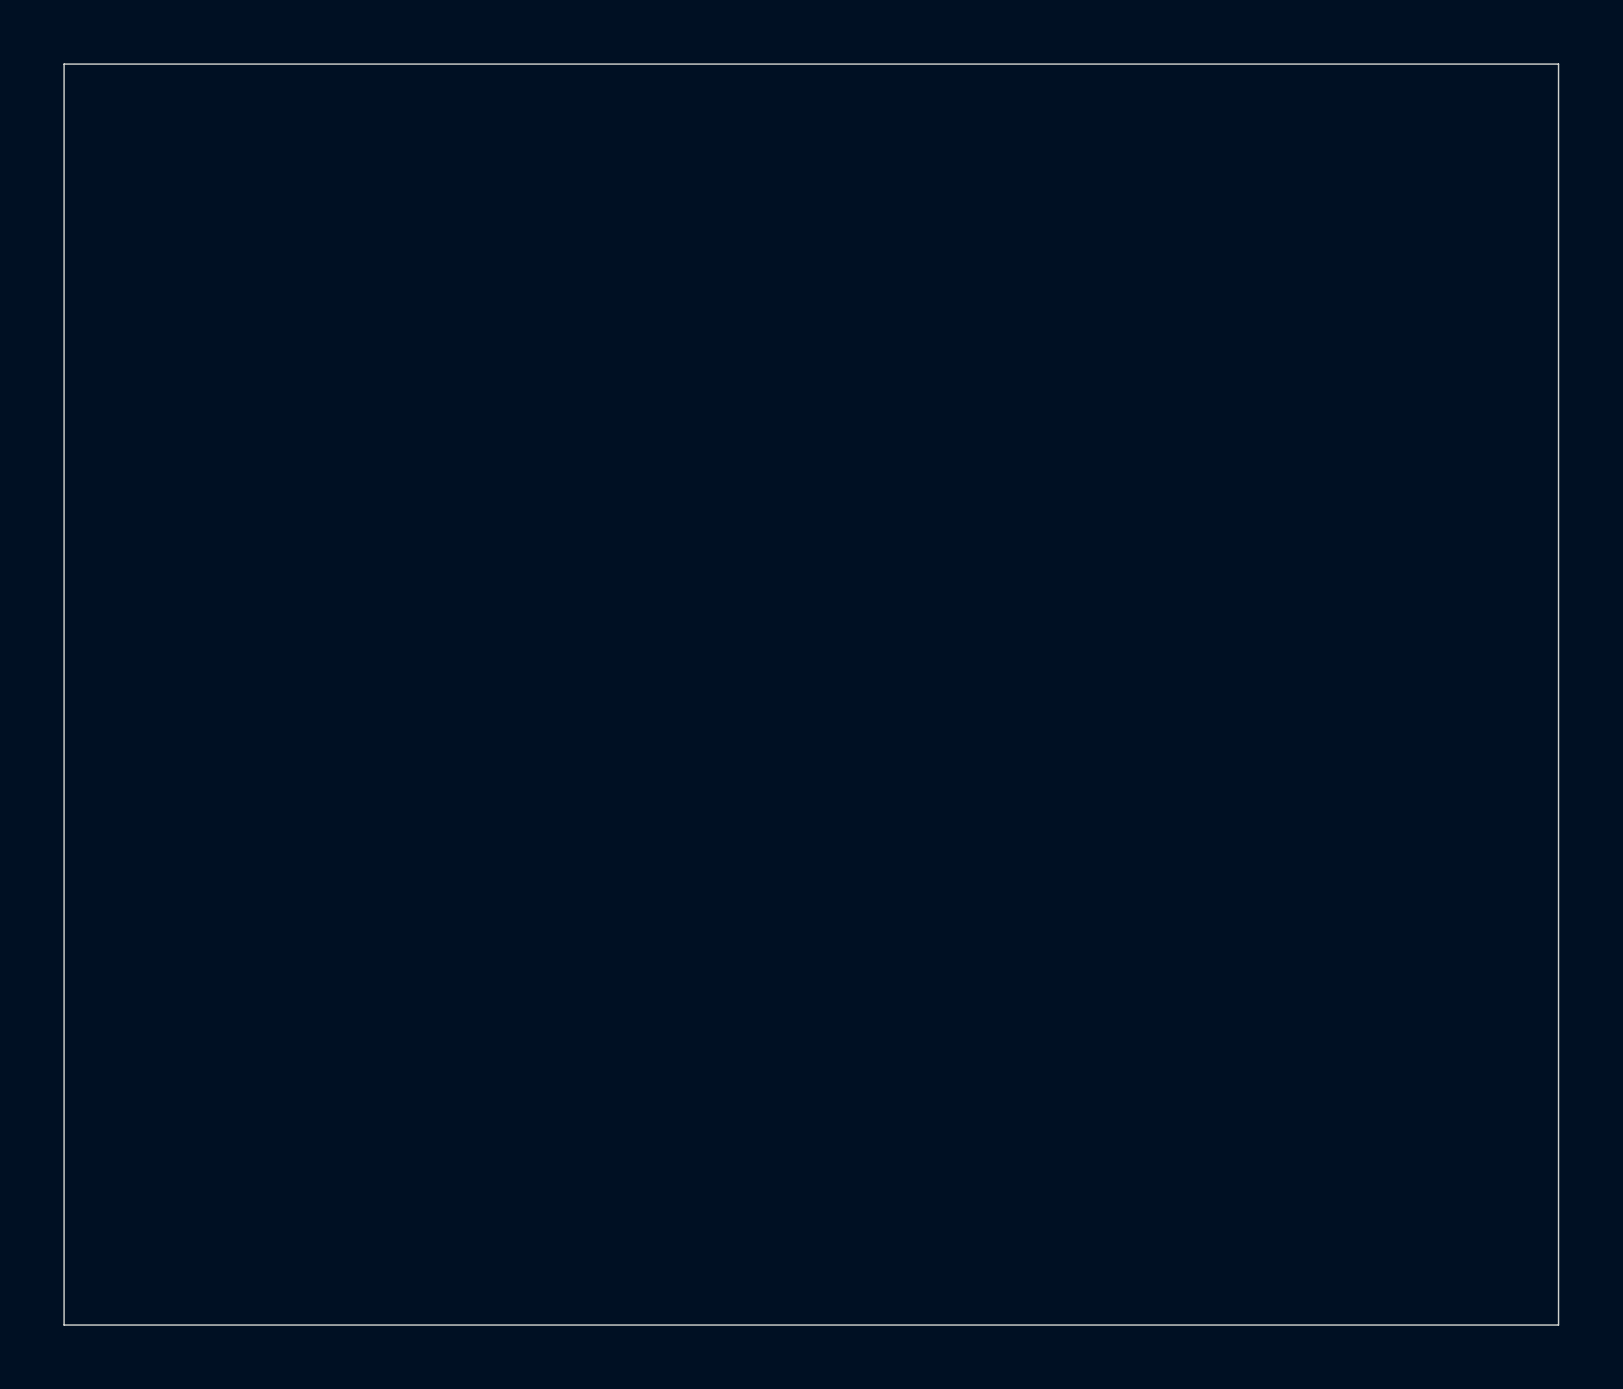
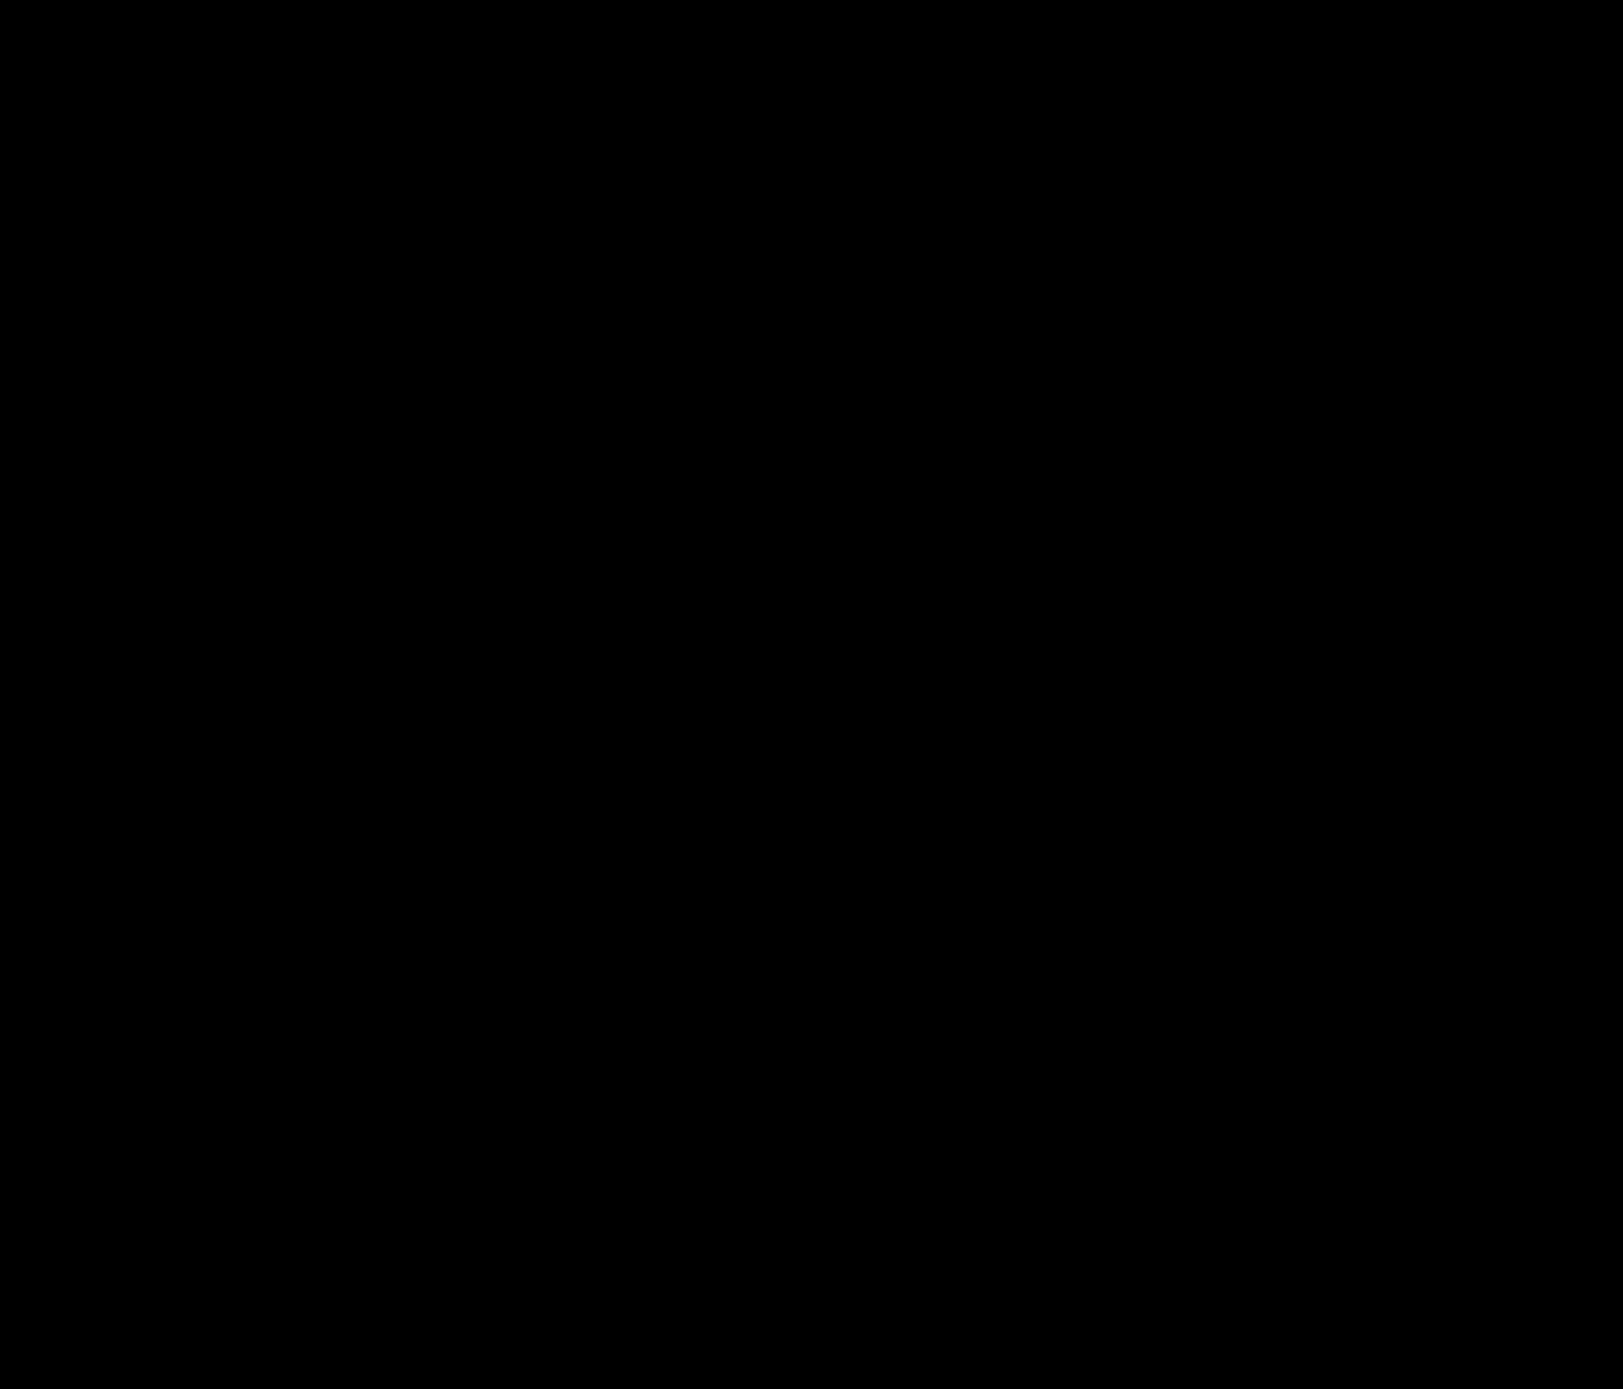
board edge: (64, 64) (64, 1325) (1558, 1325) (1558, 64) (64, 64) -> none

